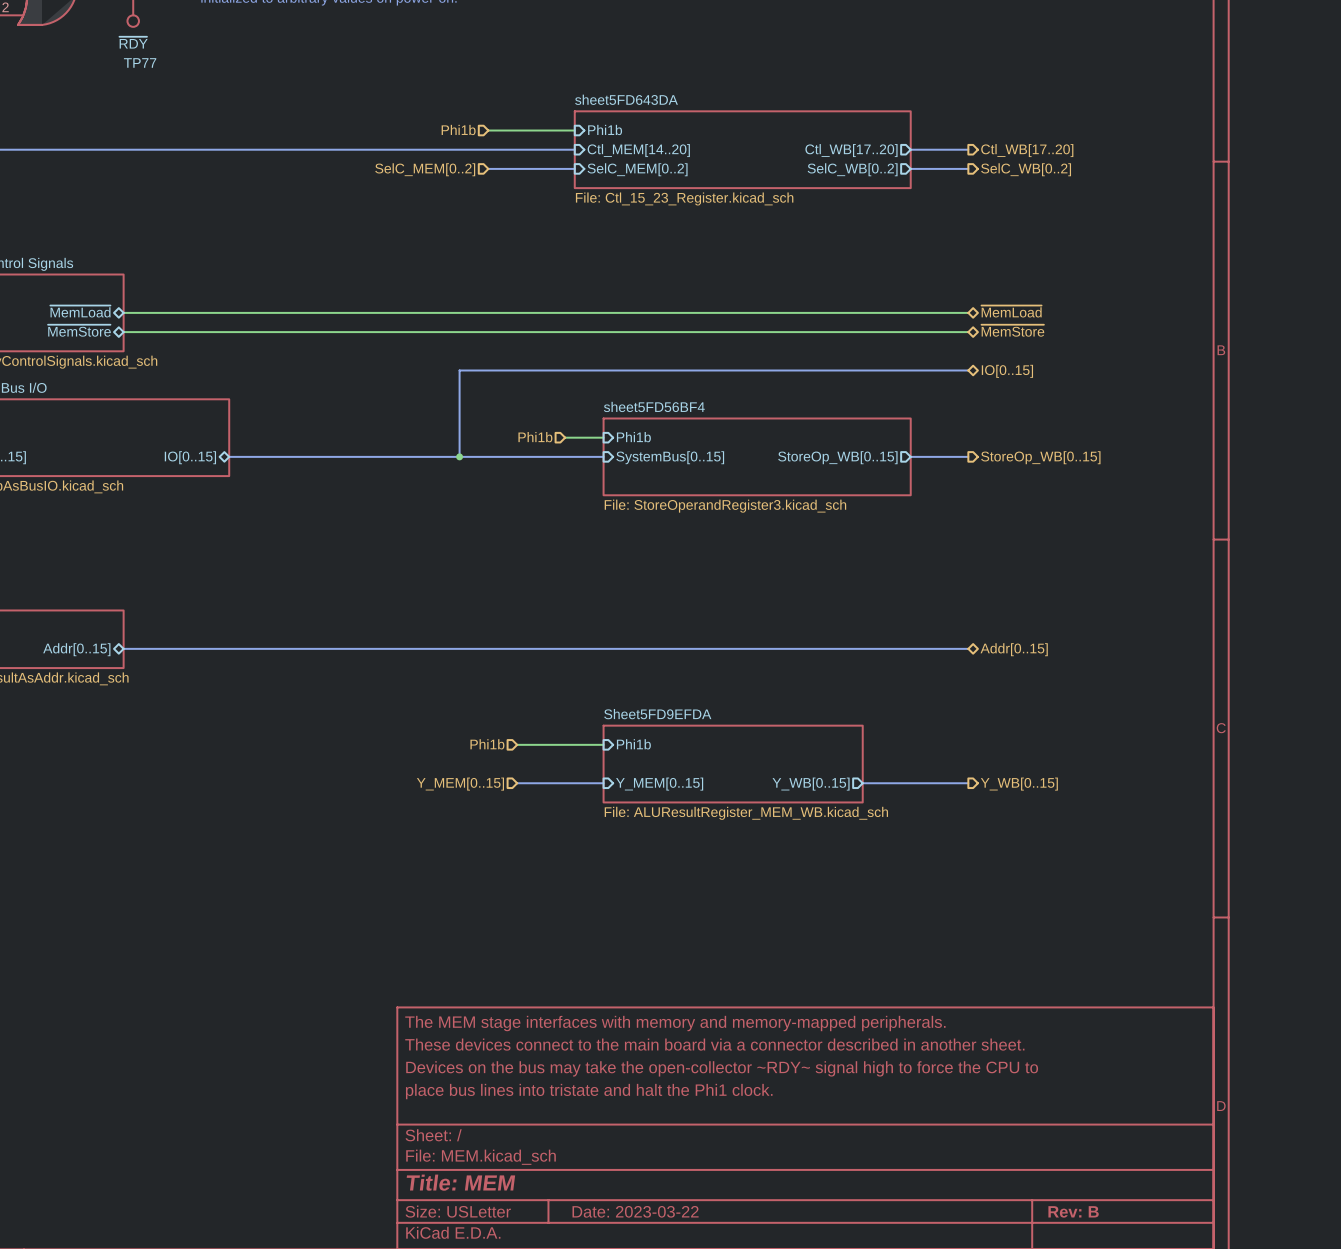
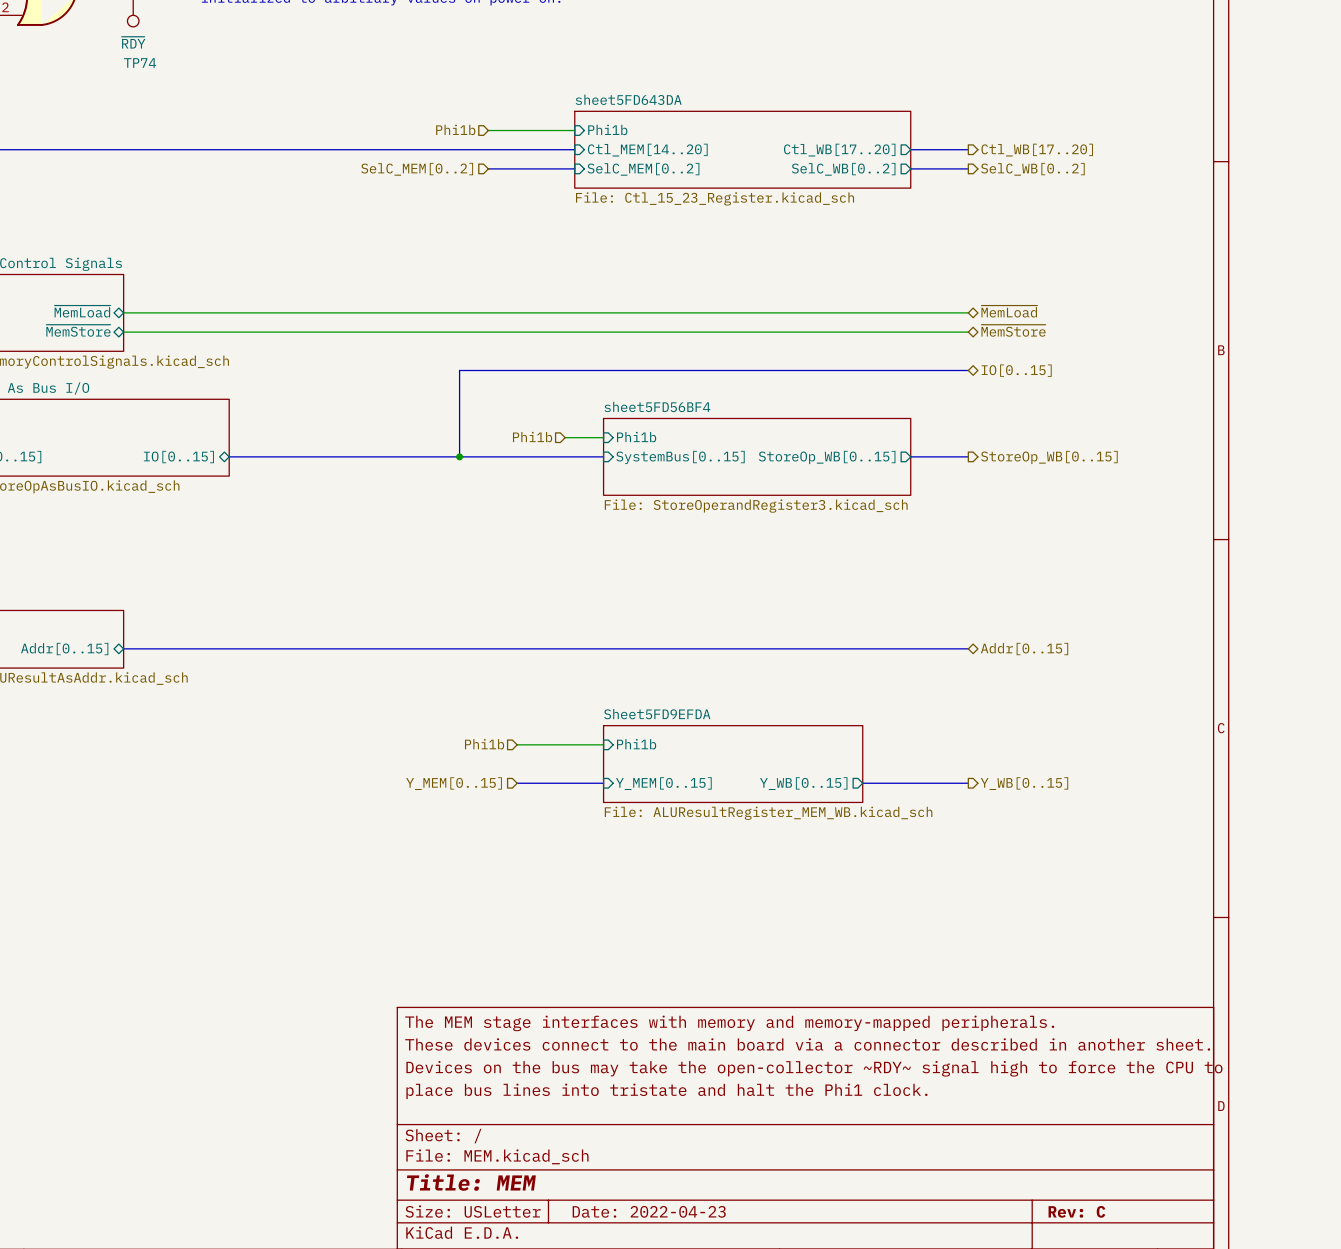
TP77 name: TP77 (140, 62) -> TP74 (140, 62)
title block: Date: 2023-03-22 (635, 1211) -> Date: 2022-04-23 (649, 1211)
title block: Rev: B (1073, 1211) -> Rev: C (1076, 1211)

